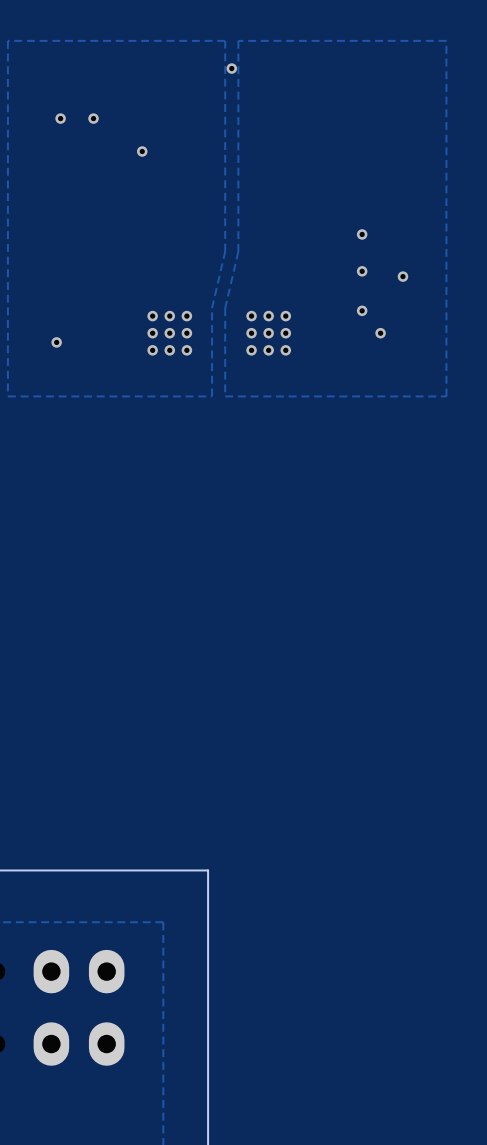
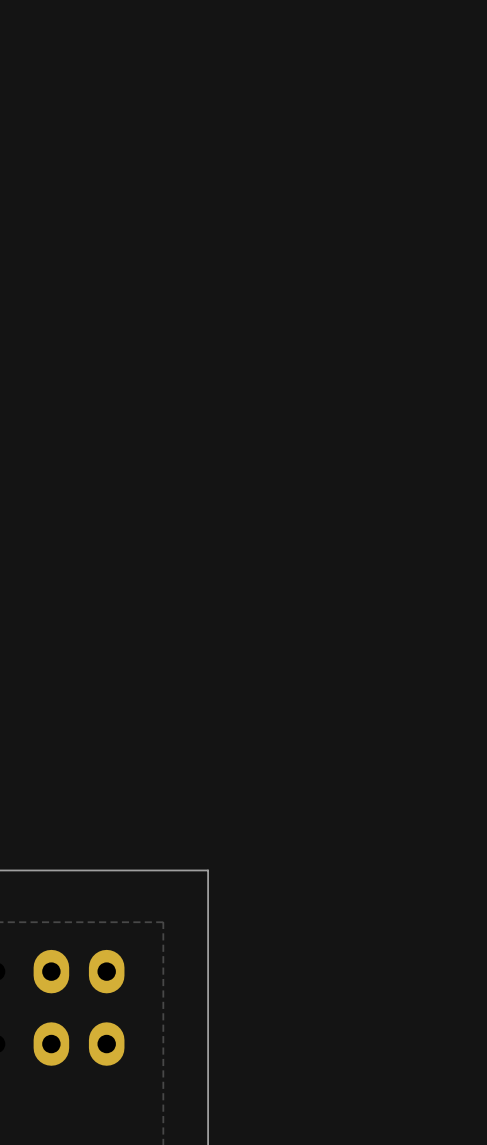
zone outline: (225, 40) (225, 251) (212, 308) (212, 396) (7, 396) (7, 40) (225, 40) -> none
zone outline: (446, 40) (238, 40) (238, 251) (225, 308) (225, 396) (446, 396) (446, 40) -> none
via: (231, 68) -> none
via: (60, 118) -> none
via: (93, 118) -> none
via: (142, 151) -> none
via: (362, 234) -> none
via: (362, 271) -> none
via: (402, 276) -> none
via: (362, 310) -> none
via: (152, 316) -> none
via: (169, 316) -> none
via: (186, 316) -> none
via: (251, 316) -> none
via: (268, 316) -> none
via: (285, 316) -> none
via: (152, 333) -> none
via: (169, 333) -> none
via: (186, 333) -> none
via: (251, 333) -> none
via: (268, 333) -> none
via: (285, 333) -> none
via: (380, 333) -> none
via: (56, 342) -> none
via: (152, 350) -> none
via: (169, 350) -> none
via: (186, 350) -> none
via: (251, 350) -> none
via: (268, 350) -> none
via: (285, 350) -> none

